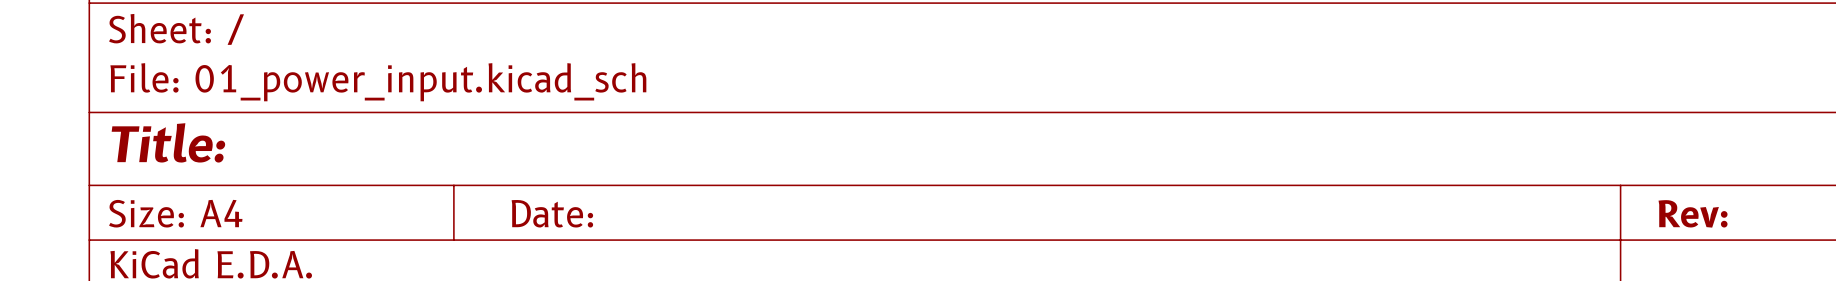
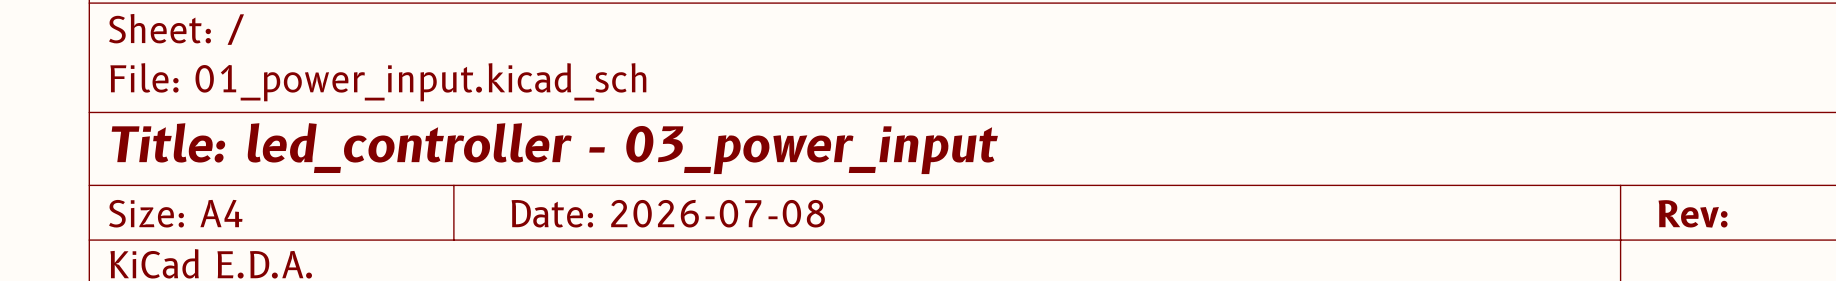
title block: Title: (168, 142) -> Title: led_controller - 03_power_input (554, 148)
title block: Date: (552, 213) -> Date: 2026-07-08 (668, 213)

